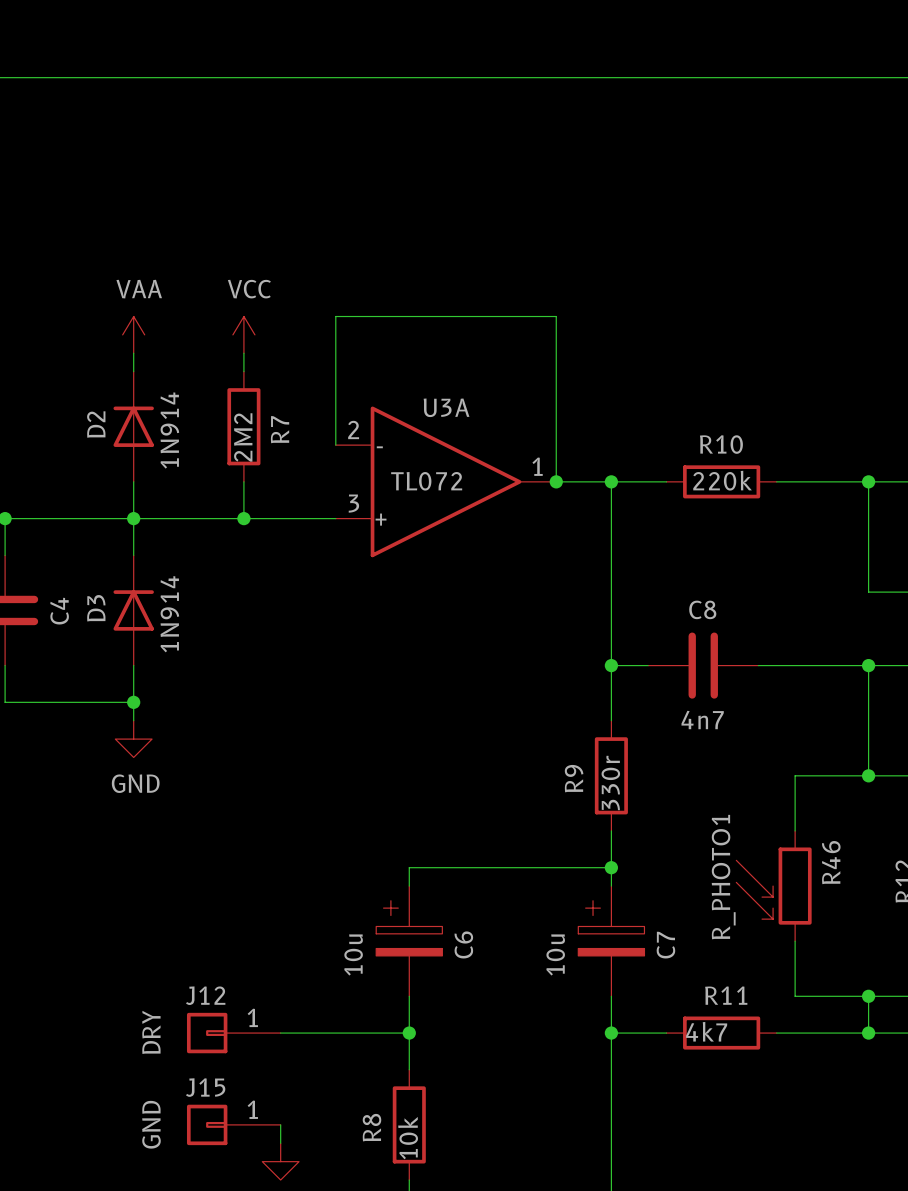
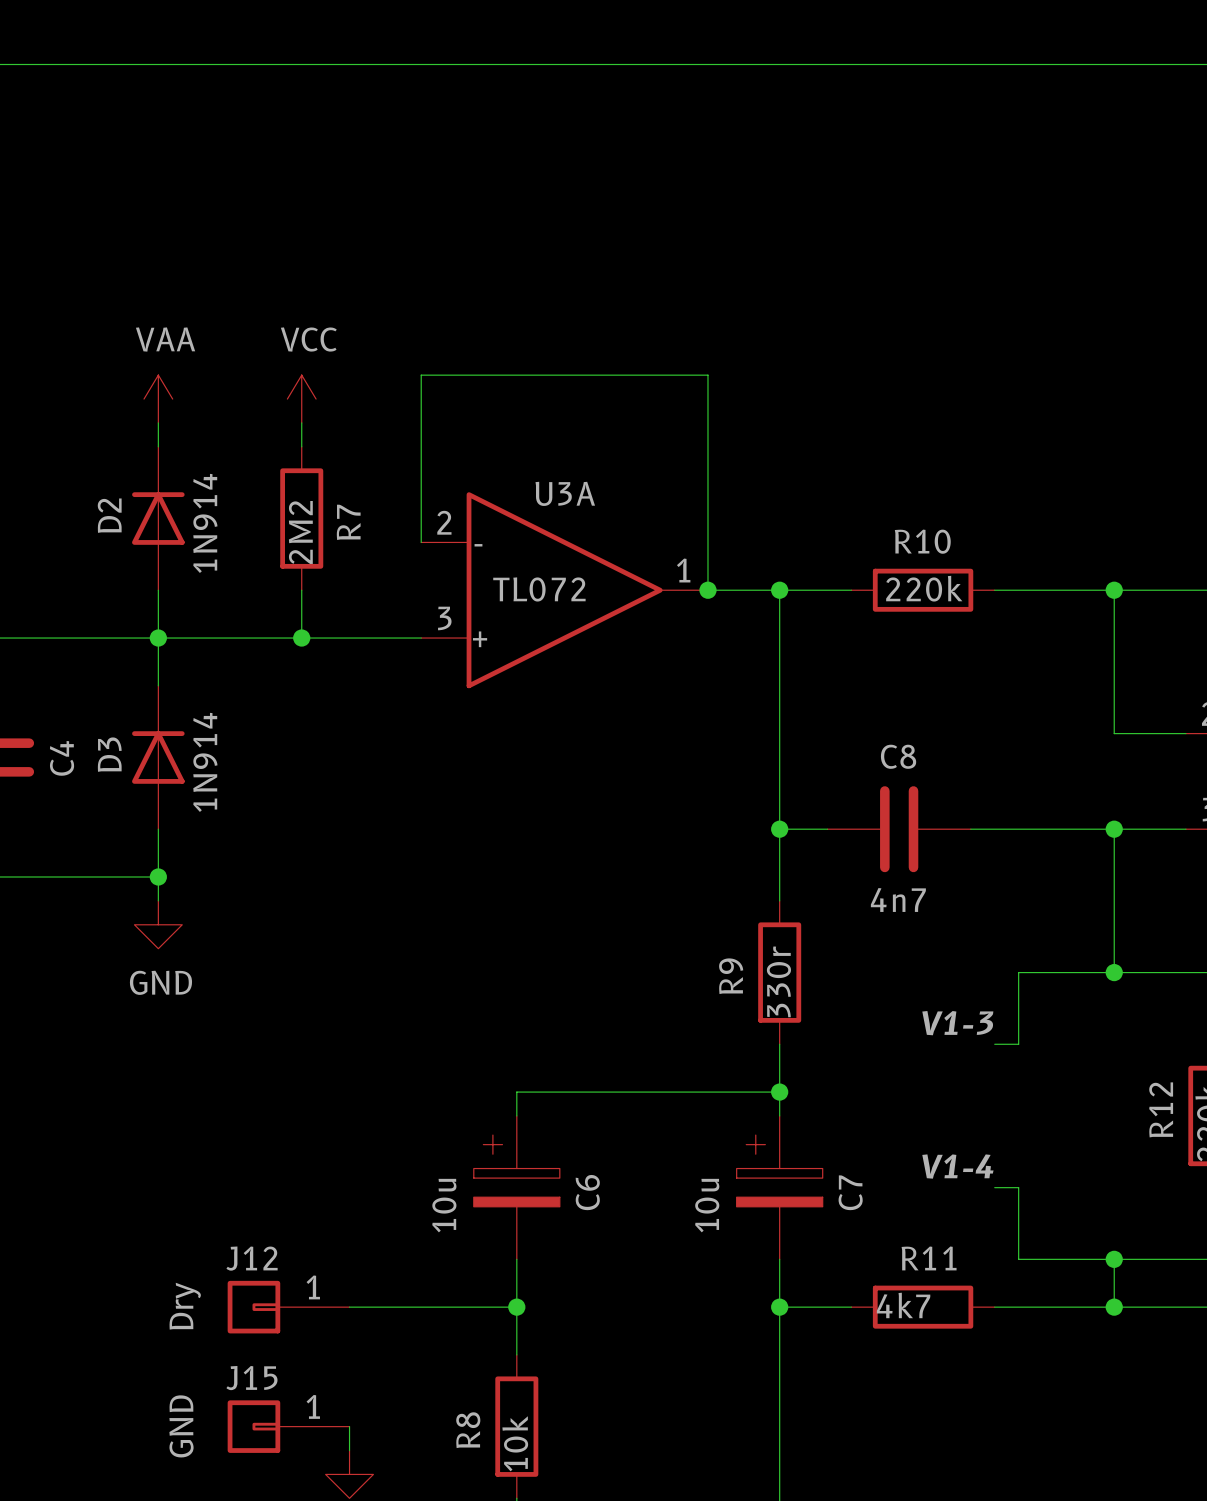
label: none -> V1-3 (957, 1023)
wire: none -> (994, 1044) (1018, 1044)
R46: R_PHOTO1 (773, 886) -> none
label: none -> V1-4 (957, 1166)
wire: none -> (994, 1187) (1018, 1187)
J12 value: DRY (151, 1032) -> Dry (185, 1306)

